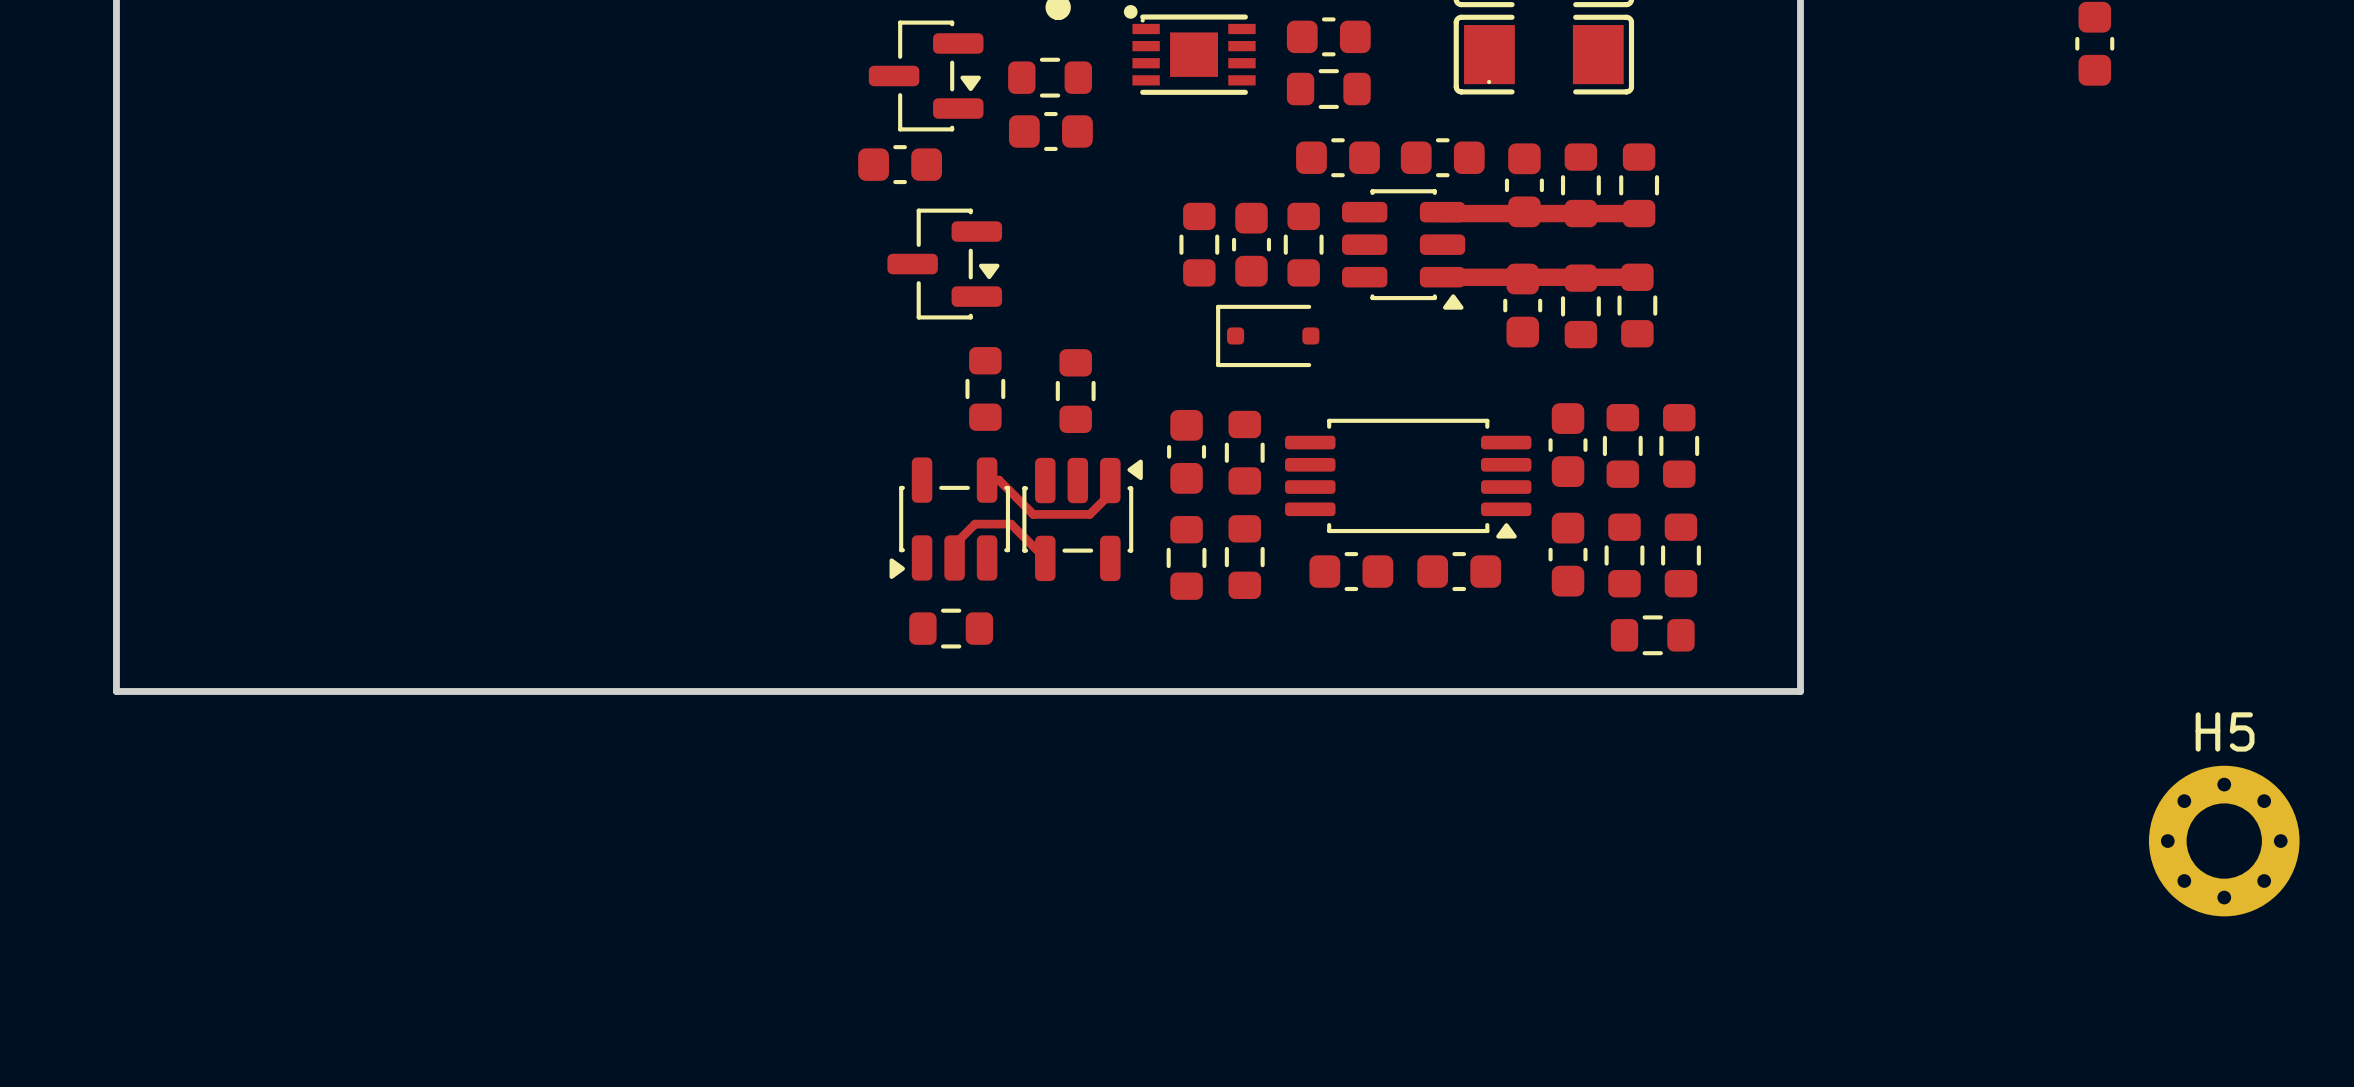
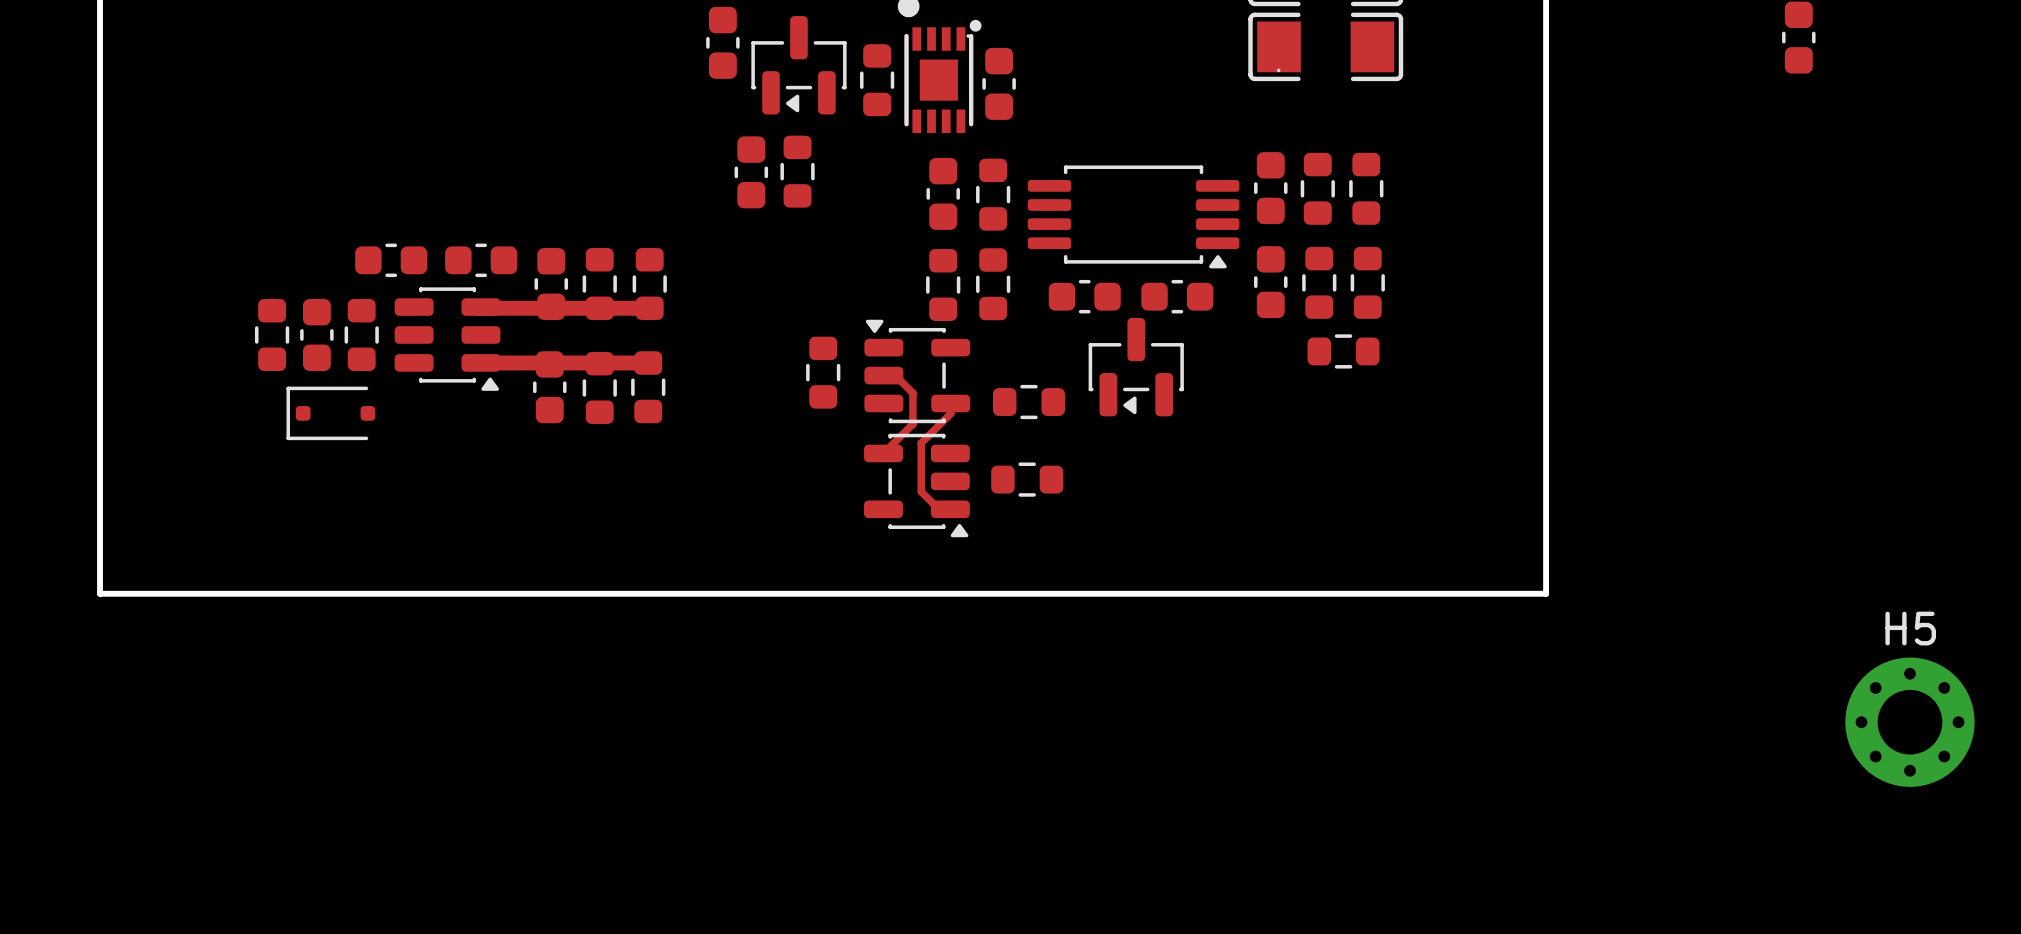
part: (1328, 36) -> none
part: none -> (722, 42)
part rotation: 0° (1189, 49) -> 90° clockwise (942, 76)
part position: (1189, 49) -> (942, 76)
part rotation: 0° (926, 75) -> 90° clockwise (798, 65)
part rotation: 0° (1050, 77) -> 90° clockwise (877, 80)
part: (1328, 89) -> none
part: none -> (999, 83)
part: (1050, 131) -> none
part: (1337, 157) -> none
part: (1442, 157) -> none
part rotation: 0° (900, 164) -> 90° clockwise (751, 172)
part: (1524, 185) -> none
part: (1580, 185) -> none
part: (1639, 185) -> none
part: none -> (797, 171)
part footprint: [1283, 202, 1324, 287] -> [1027, 165, 1240, 269]
track: (1439, 212) (1639, 213) -> none
part: none -> (1270, 188)
part: none -> (1317, 188)
part: none -> (1366, 188)
part: none -> (943, 193)
part position: (1199, 244) -> (993, 194)
part: (1251, 244) -> none
part: (1403, 249) -> none
part rotation: 0° (944, 264) -> 90° clockwise (1136, 367)
part position: (944, 264) -> (1136, 367)
track: (1446, 277) (1637, 277) -> none
part: none -> (391, 260)
part: none -> (481, 260)
part footprint: [1216, 304, 1320, 368] -> [1048, 279, 1121, 314]
part: (1522, 305) -> none
part: (1637, 305) -> none
part: (1580, 306) -> none
part: none -> (1270, 282)
part: none -> (1319, 282)
part: none -> (1367, 282)
part: none -> (551, 284)
part: none -> (599, 284)
part: none -> (649, 284)
part: none -> (943, 284)
part: none -> (993, 284)
part: none -> (1177, 296)
track: none -> (478, 307) (649, 308)
part position: (985, 388) -> (823, 372)
part: none -> (272, 334)
part: none -> (316, 334)
part: none -> (361, 334)
part: (1075, 391) -> none
part: none -> (447, 339)
part footprint: [1167, 409, 1207, 494] -> [992, 384, 1065, 420]
part: none -> (1343, 351)
track: none -> (484, 362) (648, 362)
part: none -> (917, 371)
track: none -> (883, 375) (895, 375) (912, 393) (912, 424) (883, 453)
part: (1568, 445) -> none
part: (1622, 445) -> none
part: (1679, 445) -> none
part: none -> (549, 387)
part: none -> (648, 387)
part: none -> (599, 387)
part: (1244, 452) -> none
track: none -> (950, 403) (950, 413) (921, 443) (921, 491) (938, 509) (950, 509)
part: (1408, 478) -> none
track: (987, 480) (998, 480) (1033, 514) (1089, 514) (1110, 493) (1110, 480) -> none
part: none -> (330, 413)
part: (949, 519) -> none
part: (1082, 519) -> none
part: (1568, 554) -> none
part: (1624, 555) -> none
part: (1680, 555) -> none
track: (954, 557) (954, 544) (975, 524) (1010, 524) (1045, 558) -> none
part rotation: 0° (1186, 557) -> 90° clockwise (1027, 479)
part: (1244, 557) -> none
part: none -> (916, 485)
part: (1351, 571) -> none
part: (1459, 571) -> none
part: (951, 628) -> none
part: (1652, 635) -> none

